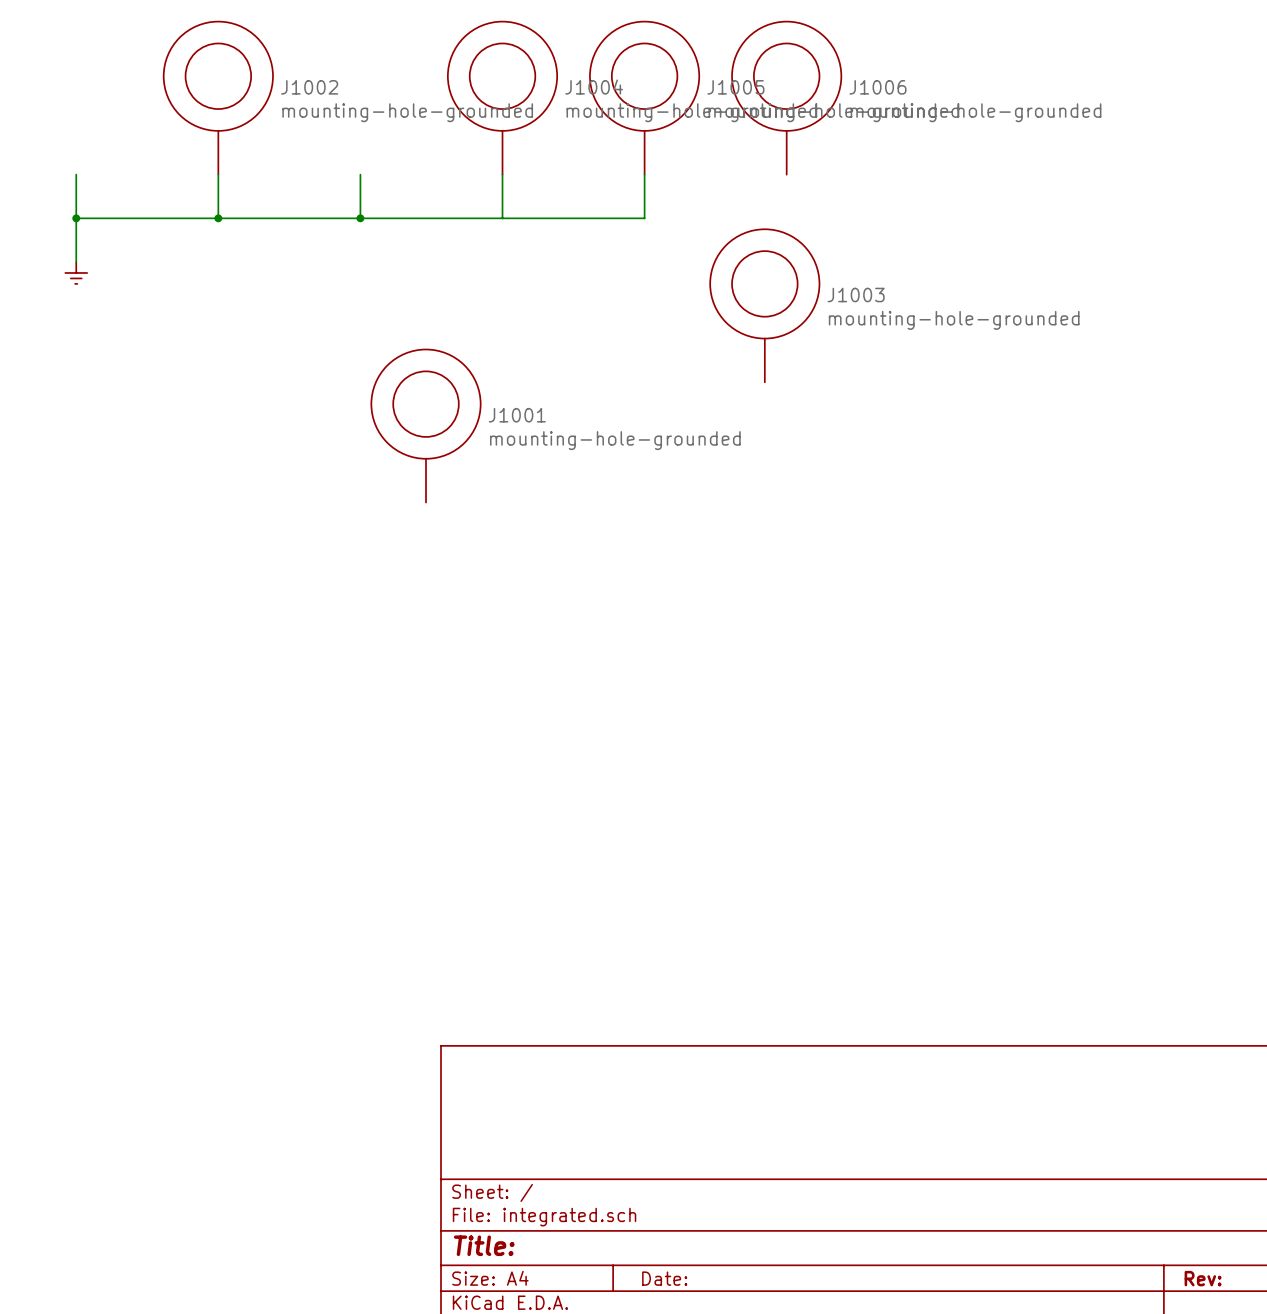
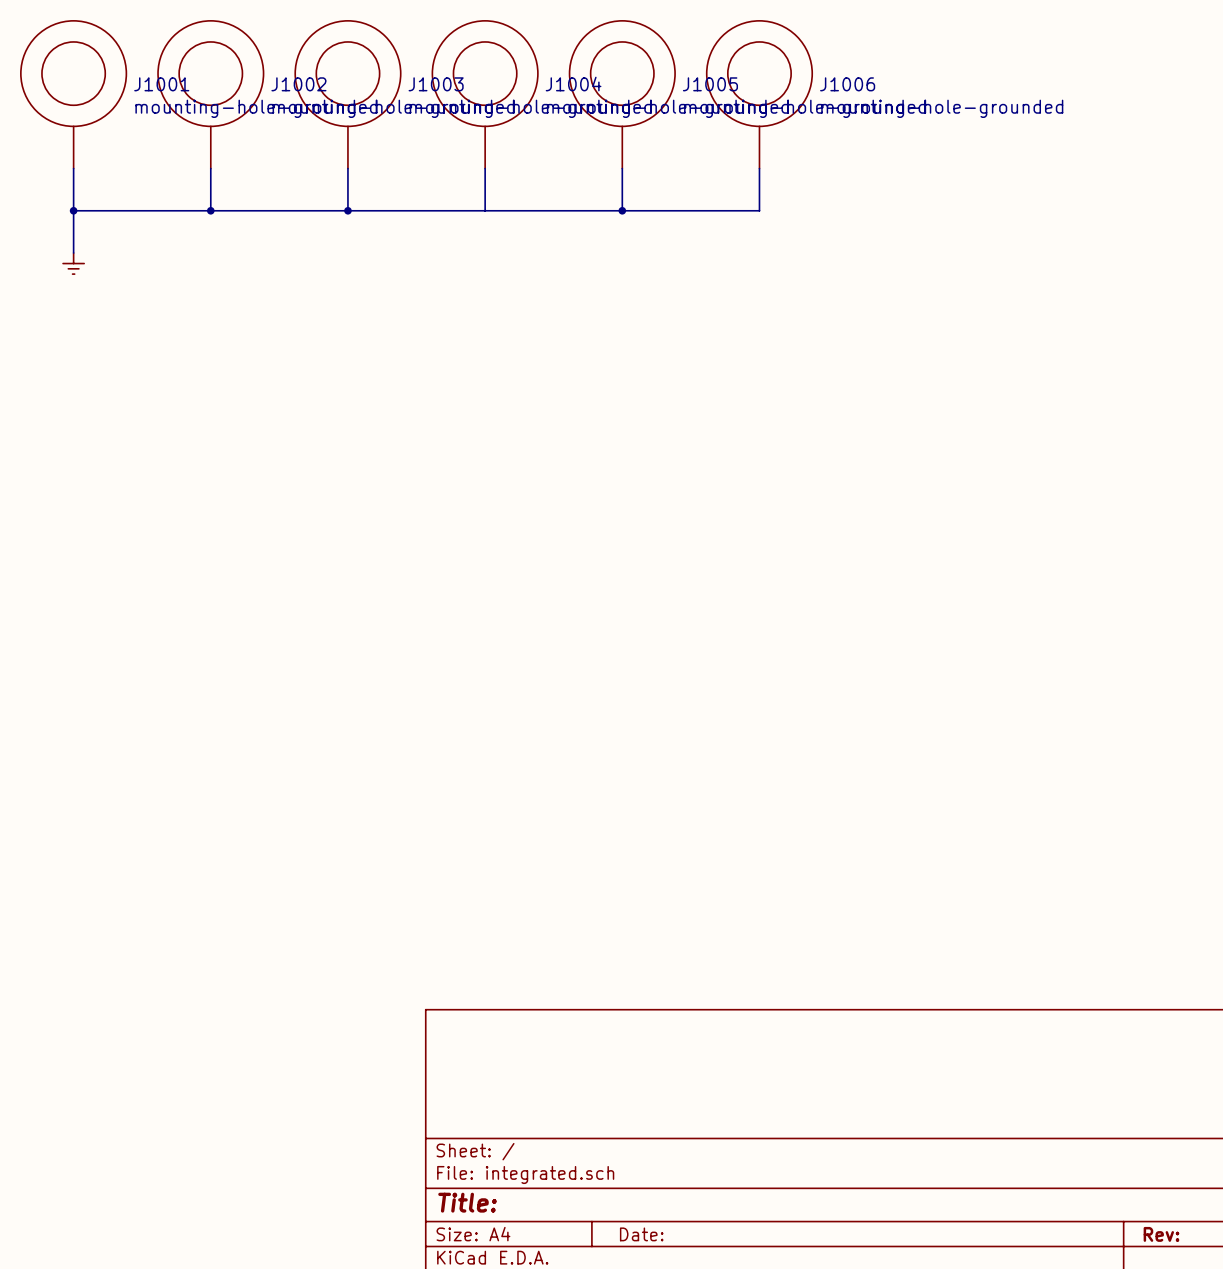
wire: none -> (759, 168) (759, 210) (622, 210)
junction: none -> (622, 210)
J1003 position: (764, 305) -> (347, 94)
J1001 position: (426, 426) -> (73, 94)

